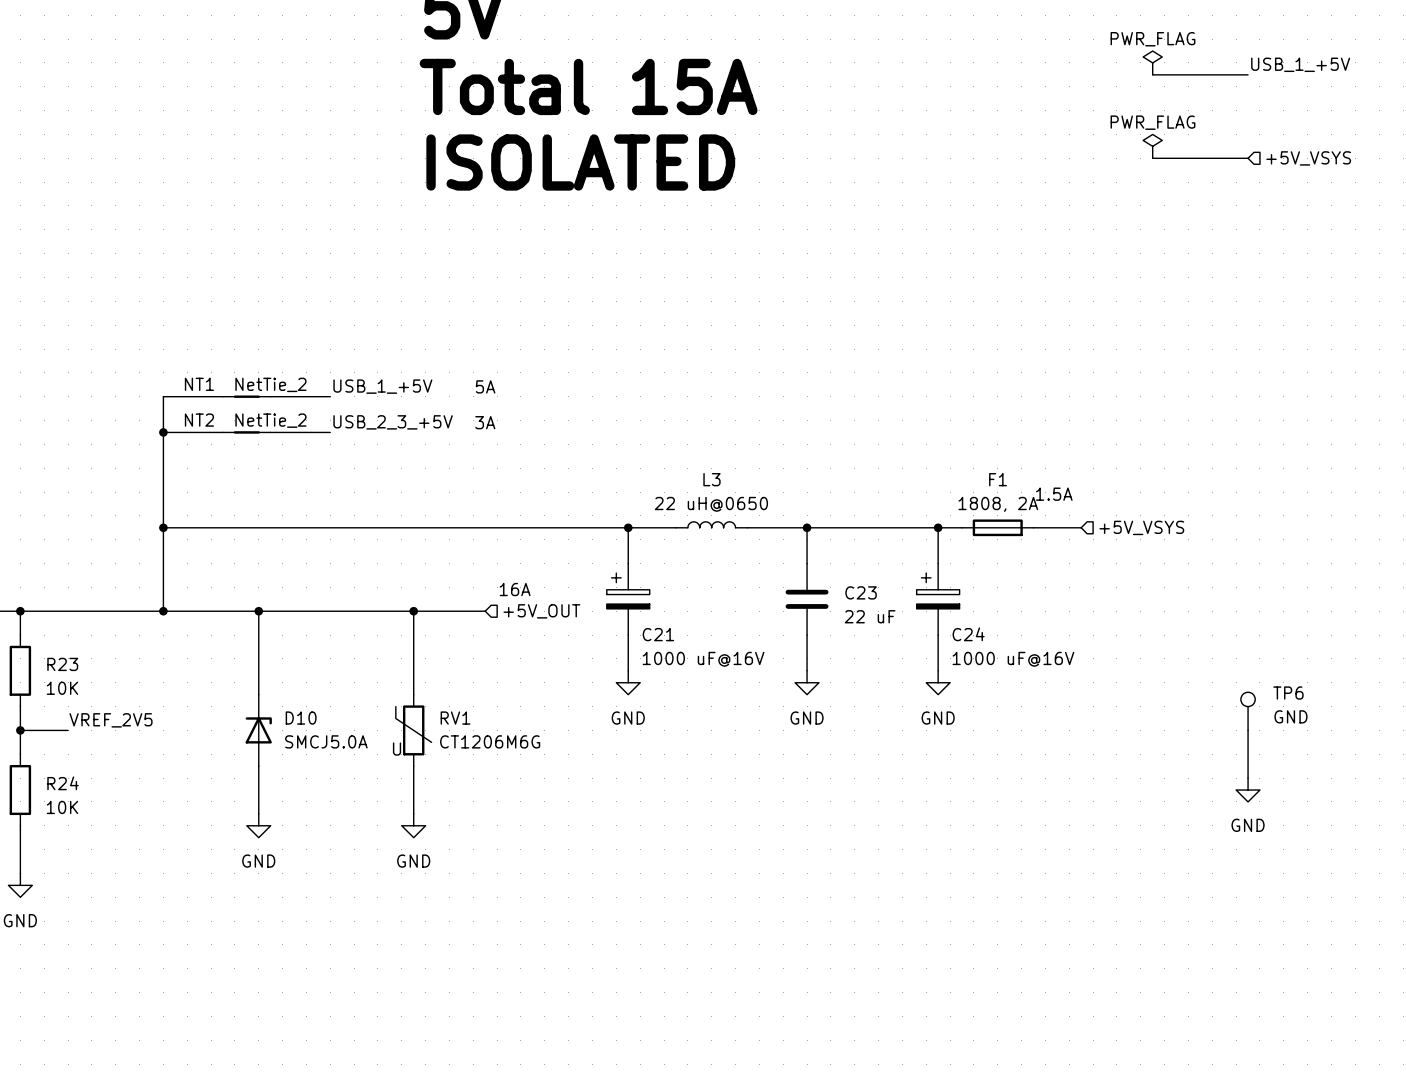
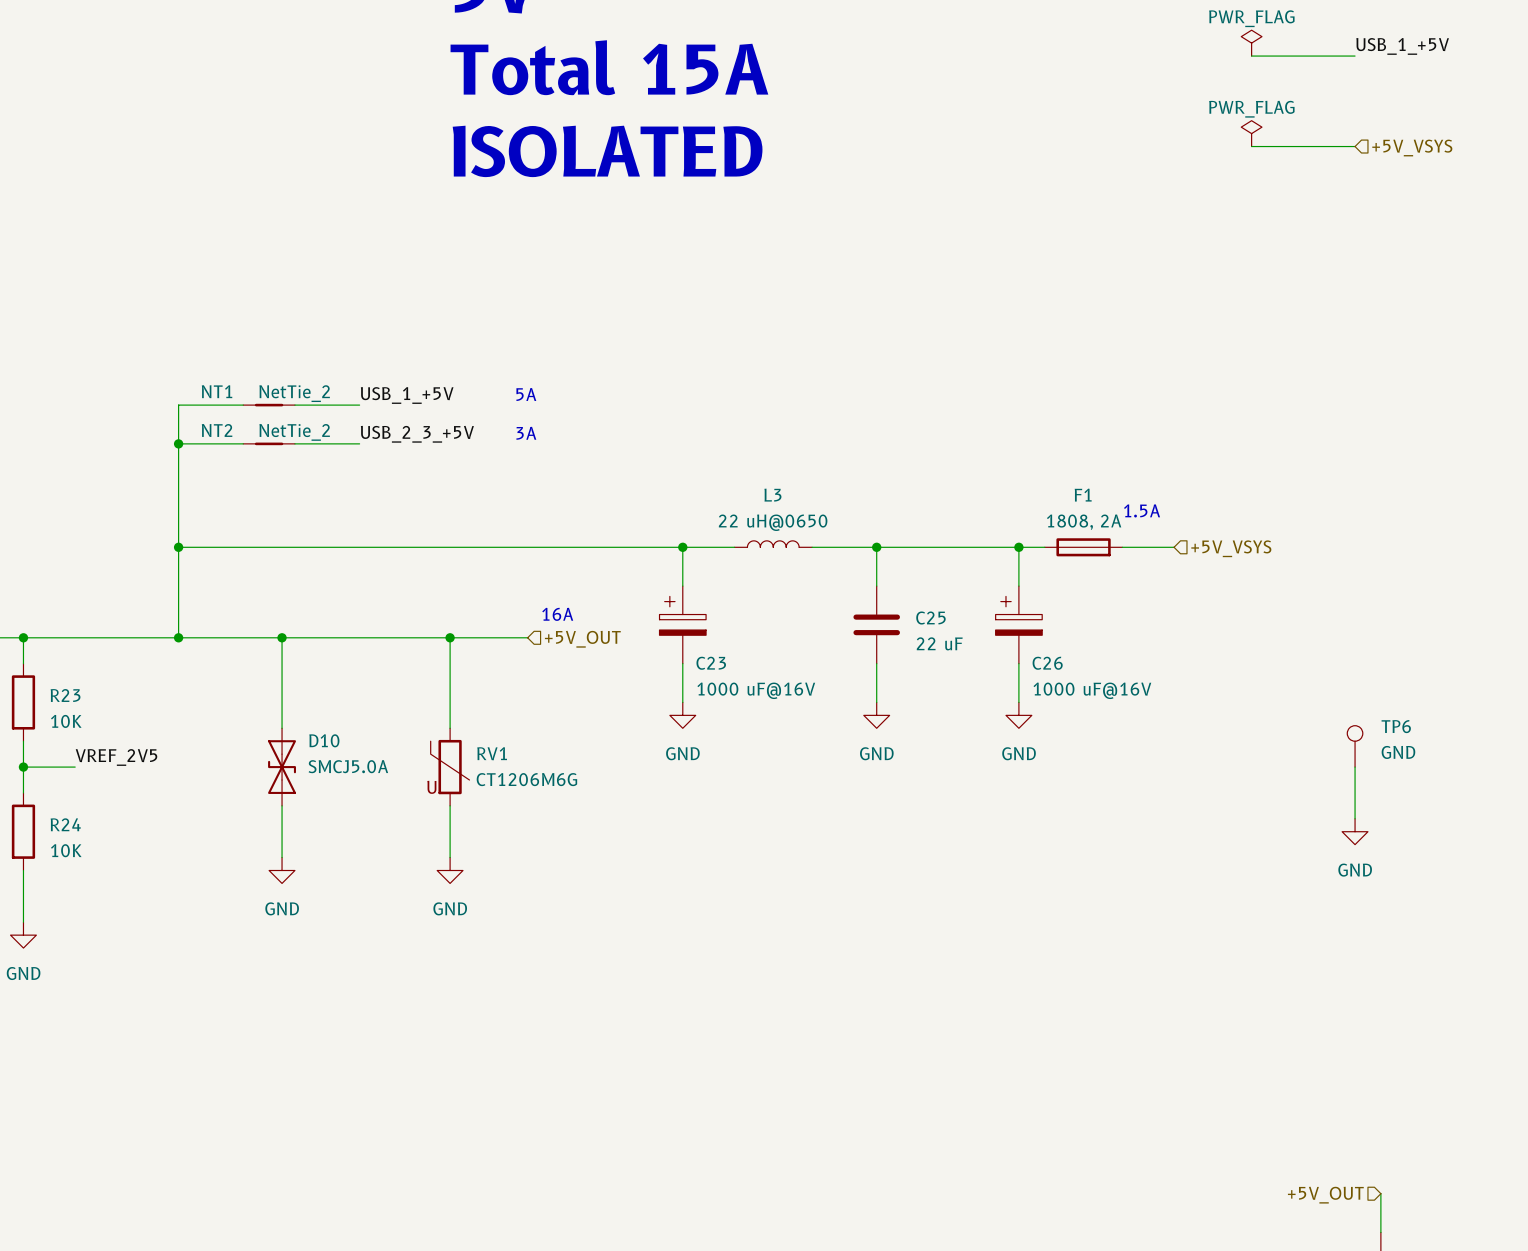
C23 name: C23 (861, 592) -> C25 (930, 618)
C21 name: C21 (658, 634) -> C23 (711, 663)
C24 name: C24 (968, 634) -> C26 (1047, 663)
D10 symbol: [245, 694, 272, 767] -> [268, 728, 296, 806]

